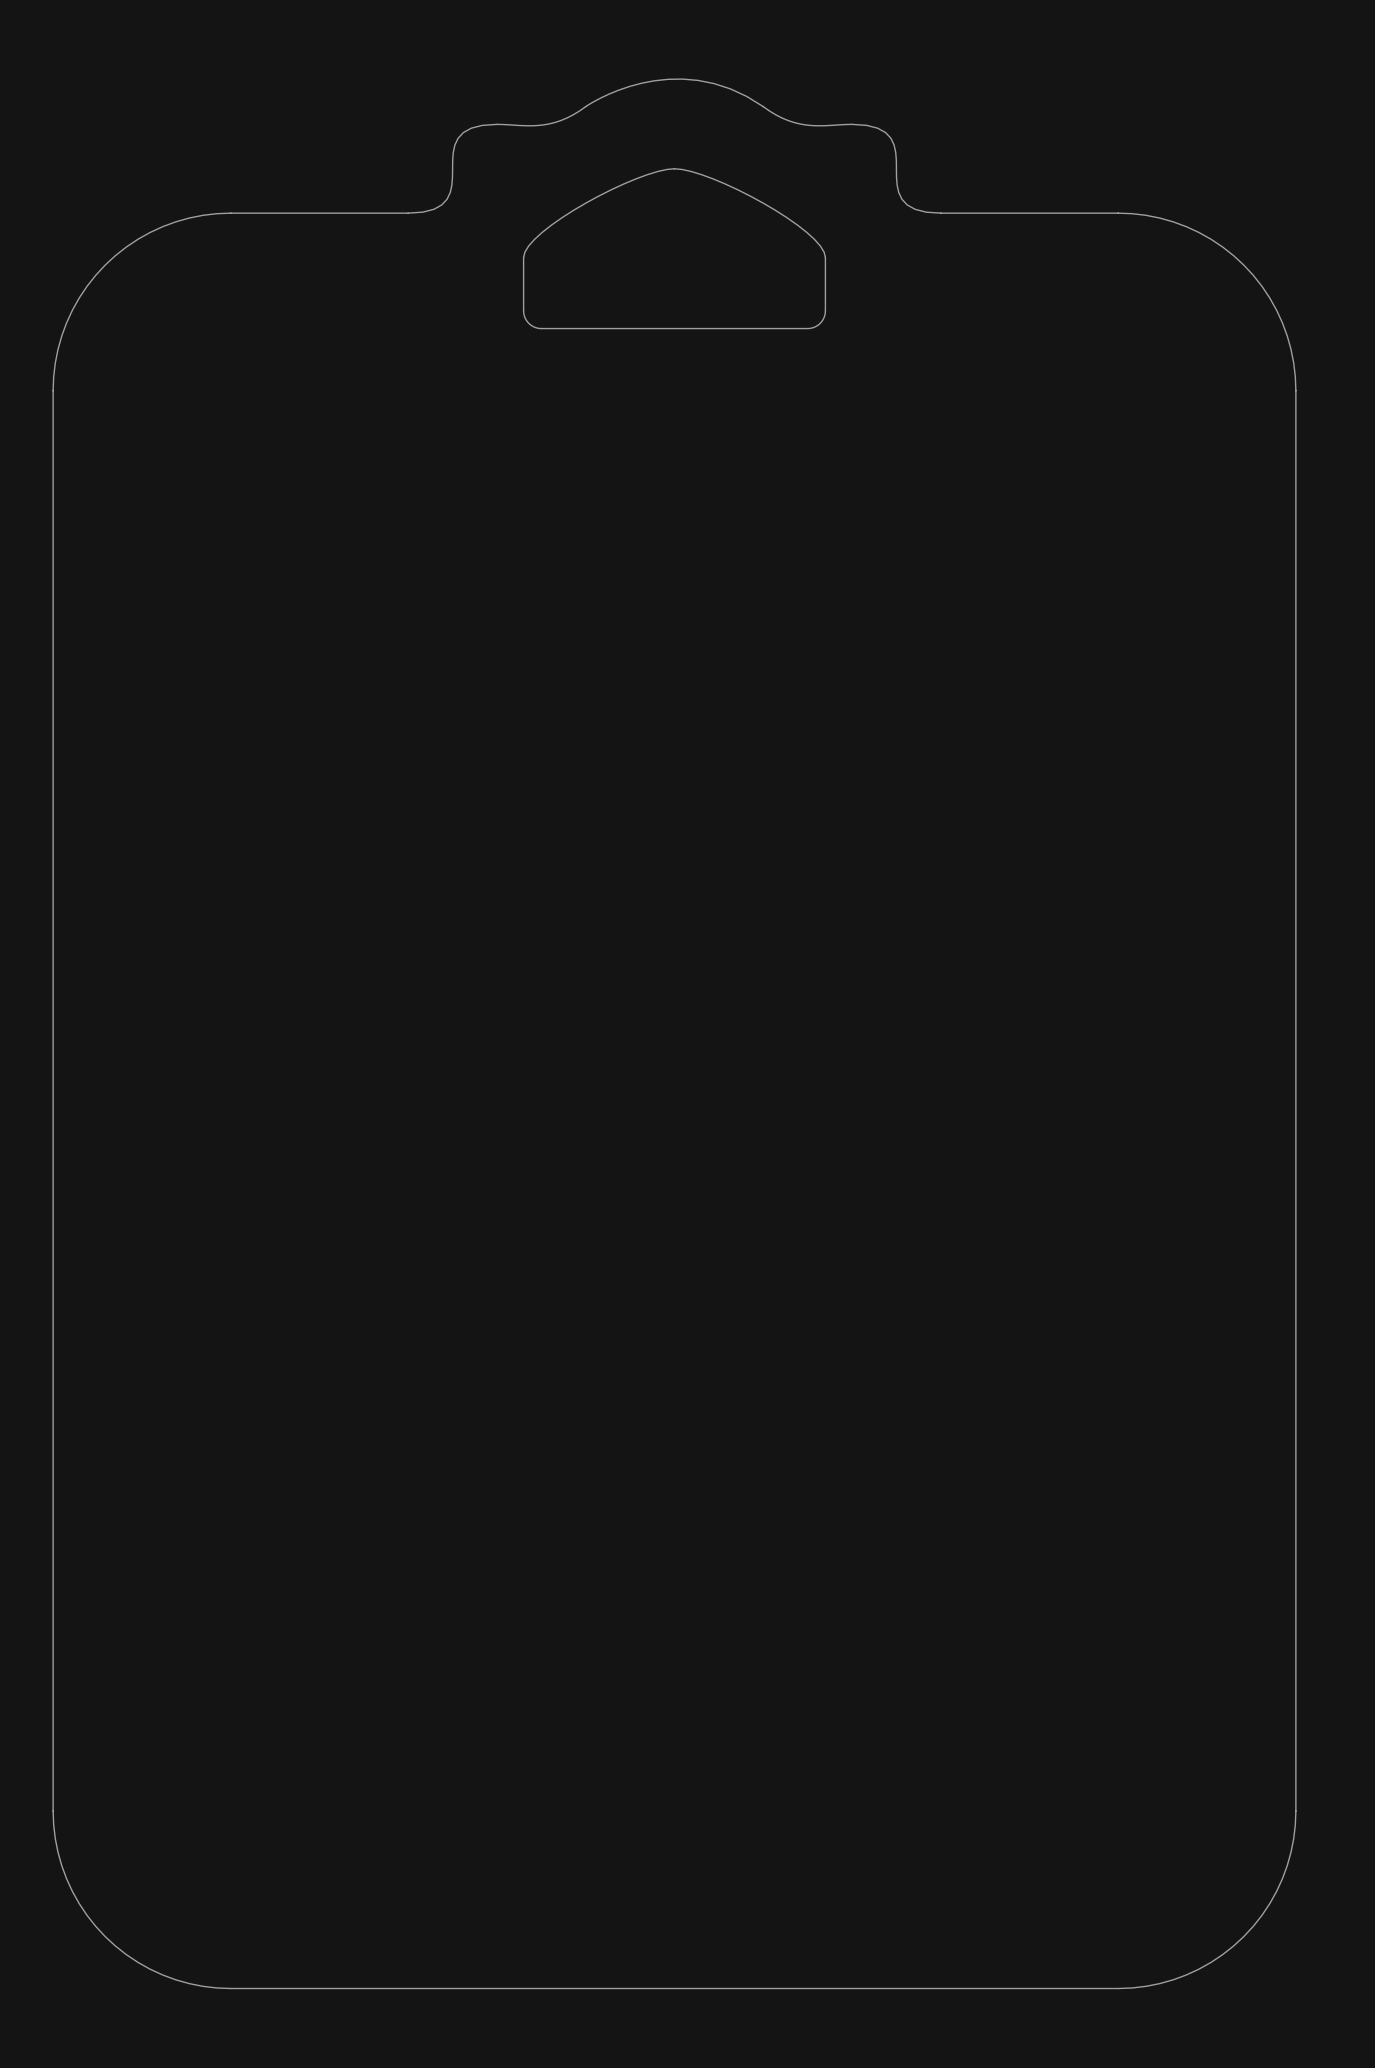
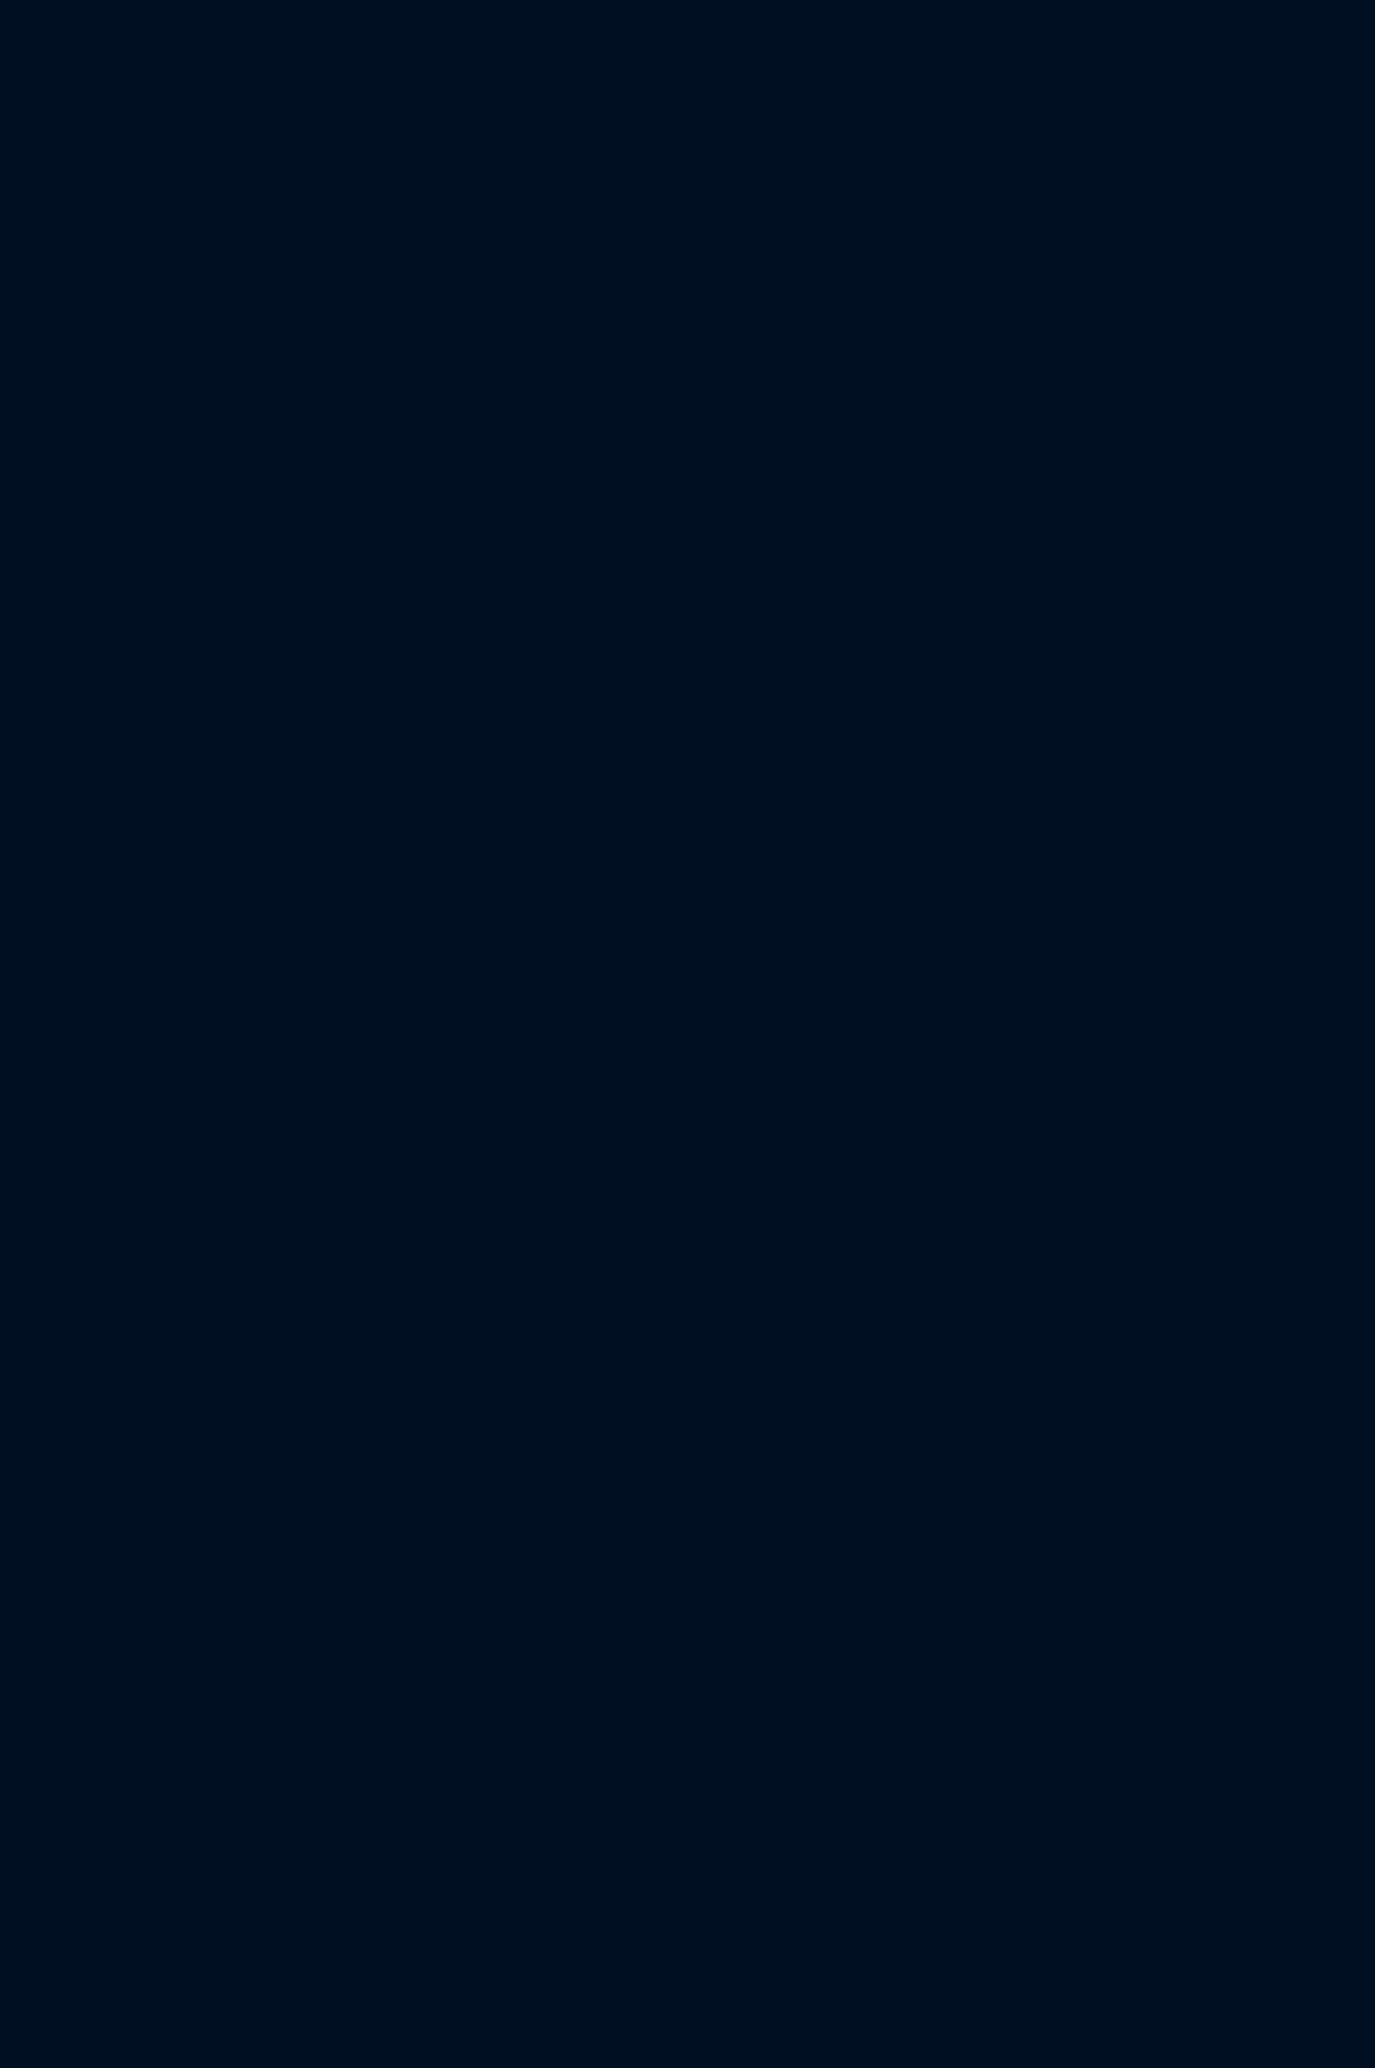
board edge: (763, 106) (782, 118) (799, 123) (866, 125) (885, 132) (894, 144) (898, 192) (907, 204) (915, 209) (940, 213) (1132, 213) (1159, 218) (1186, 226) (1222, 247) (1243, 265) (1269, 297) (1287, 335) (1293, 362) (1295, 390) (1295, 1810) (1293, 1838) (1287, 1865) (1276, 1891) (1261, 1915) (1243, 1936) (1222, 1954) (1198, 1969) (1173, 1979) (1132, 1987) (230, 1988) (202, 1986) (175, 1979) (150, 1969) (126, 1954) (105, 1936) (87, 1915) (72, 1891) (61, 1865) (53, 1824) (53, 390) (55, 362) (61, 335) (79, 297) (105, 265) (137, 239) (175, 221) (216, 213) (408, 213) (433, 209) (441, 204) (450, 192) (454, 144) (463, 132) (482, 125) (532, 125) (554, 122) (572, 115) (609, 94) (641, 83) (668, 79) (698, 80) (730, 88) (763, 106) -> none
board edge: (674, 168) (701, 174) (750, 196) (787, 217) (814, 239) (824, 252) (825, 257) (825, 312) (820, 323) (807, 328) (541, 328) (528, 323) (523, 312) (523, 257) (524, 252) (534, 239) (561, 217) (598, 196) (647, 174) (674, 168) -> none

